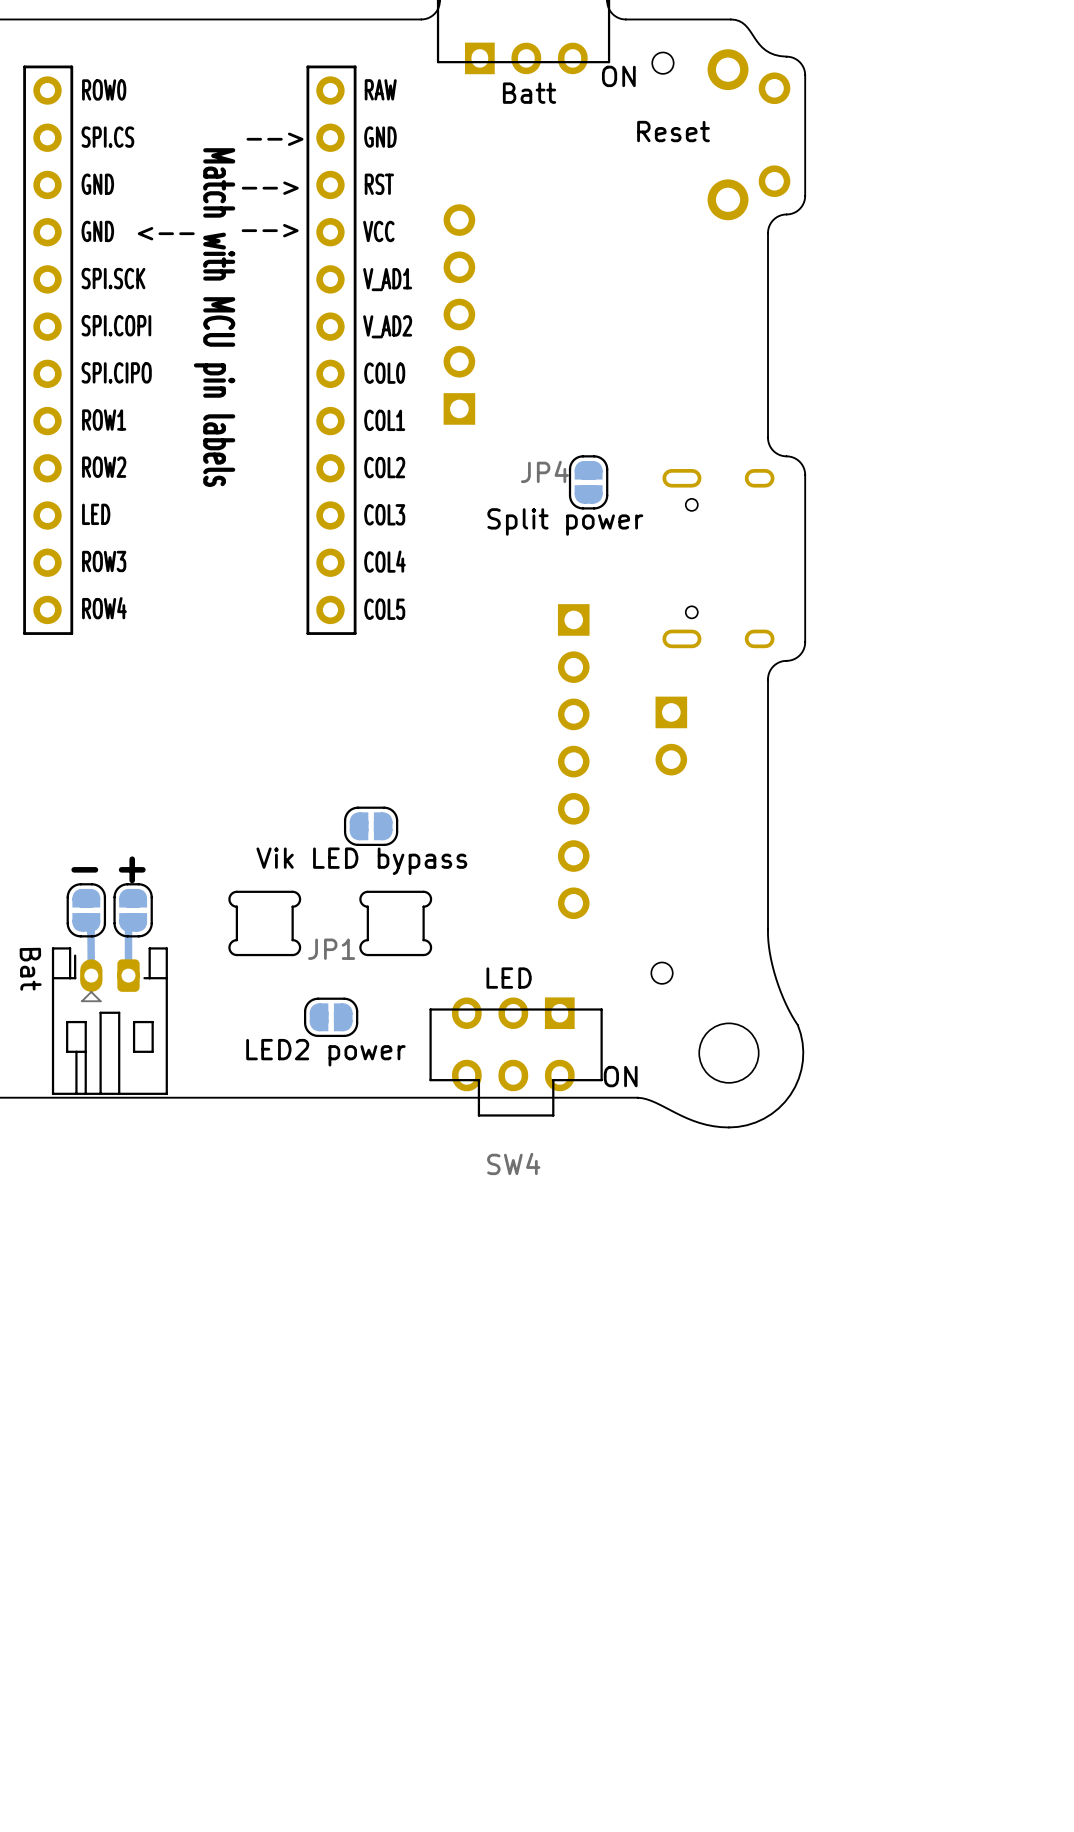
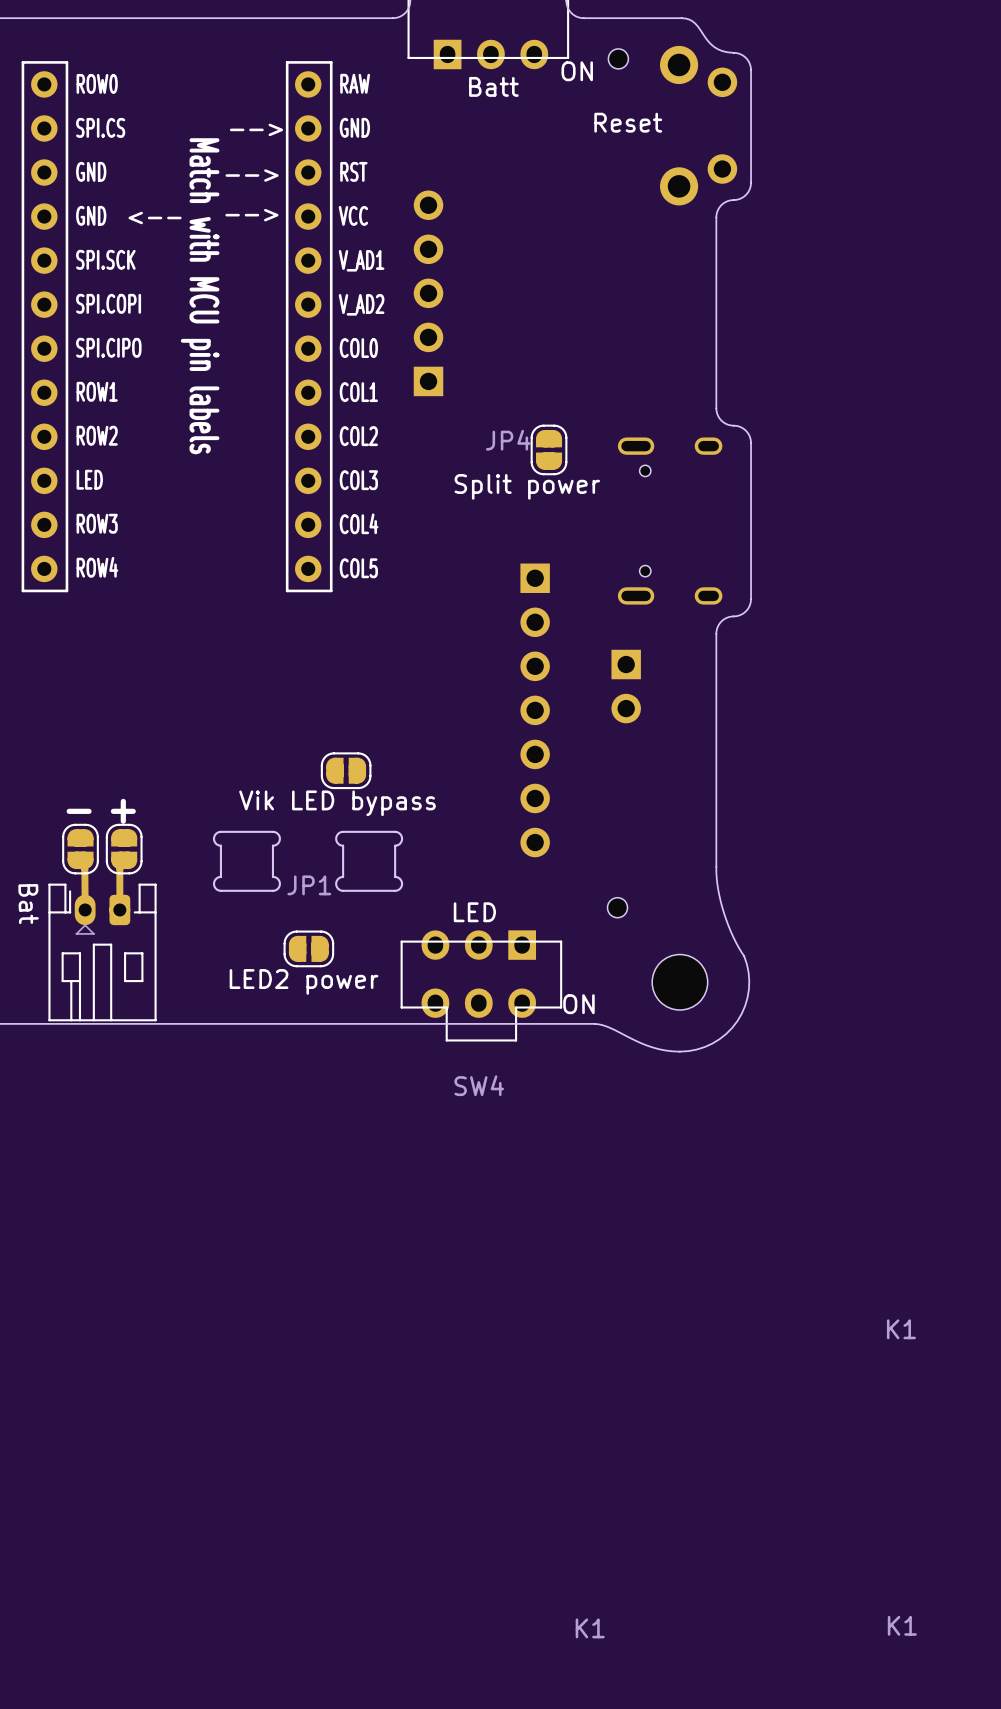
K1: none -> (901, 1329)
K1: none -> (902, 1625)
K1: none -> (590, 1628)

